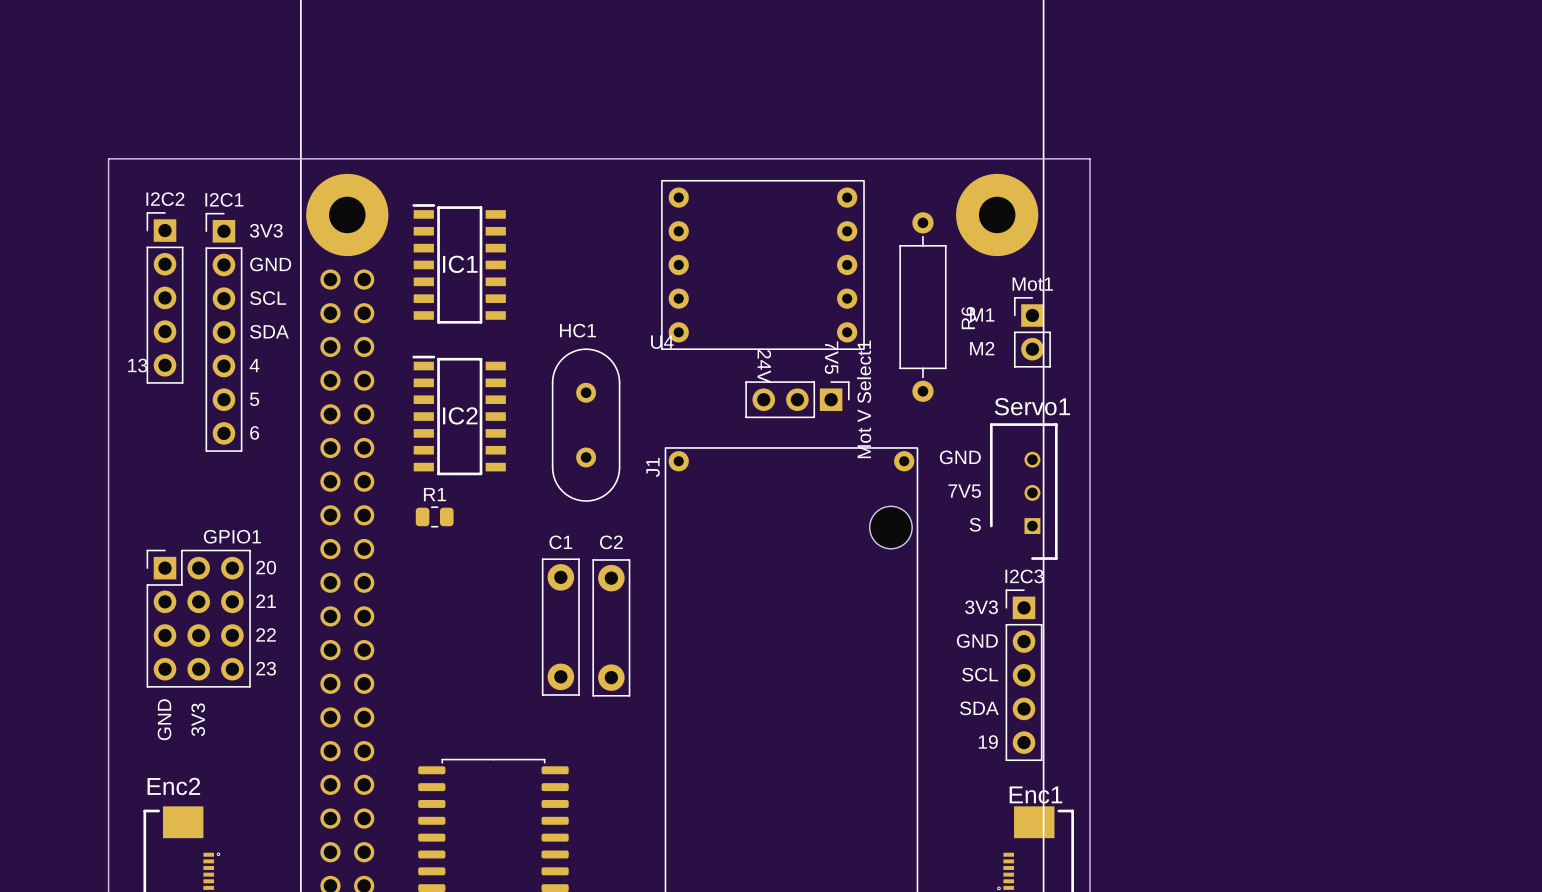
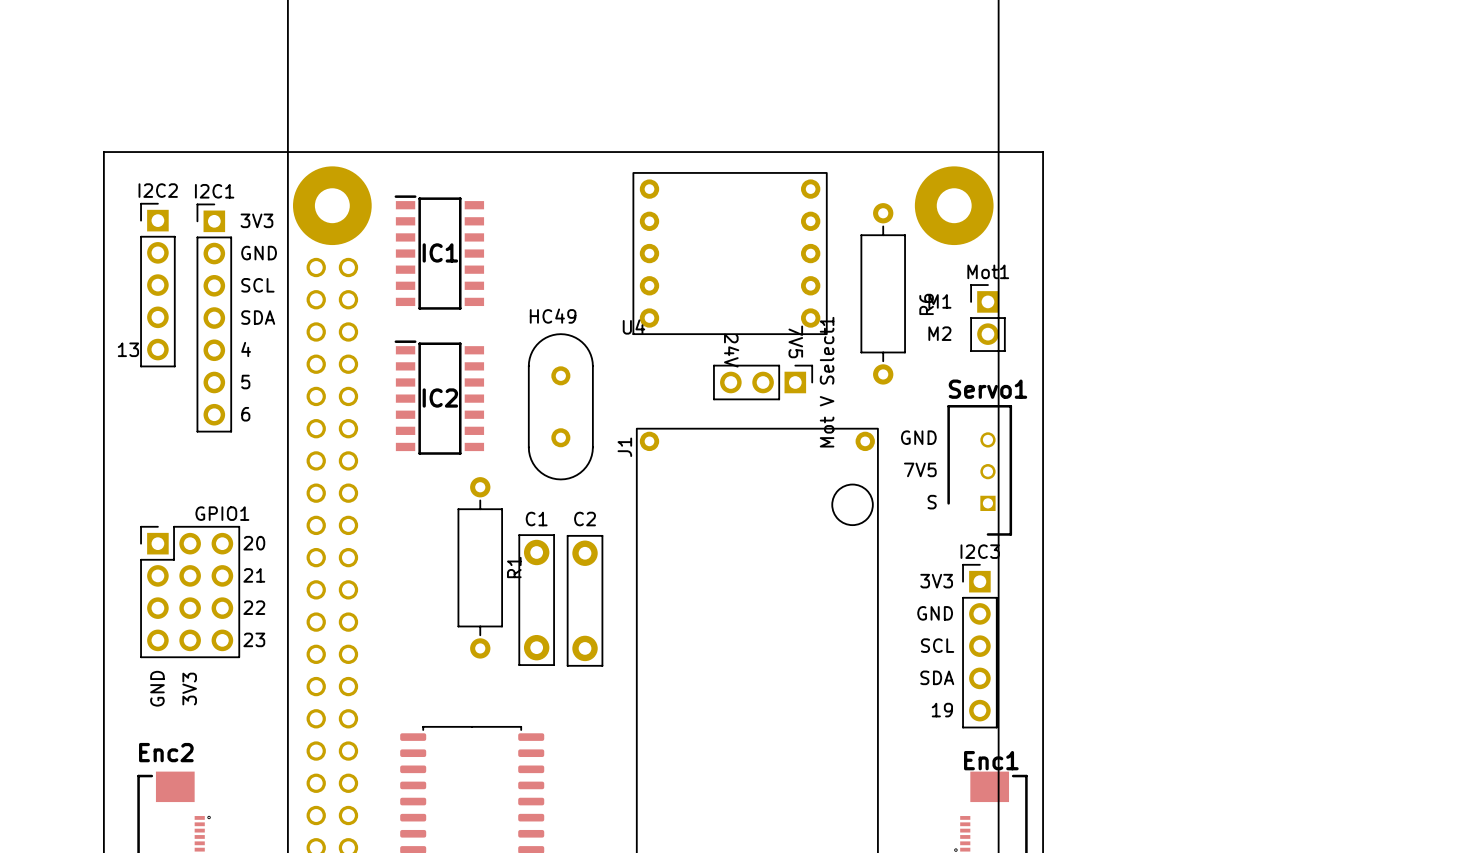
HC1 name: HC1 (578, 330) -> HC49 (553, 316)
R1 name position: R1 (434, 494) -> R1 (514, 567)
R1 footprint: [415, 506, 454, 528] -> [457, 477, 503, 659]

